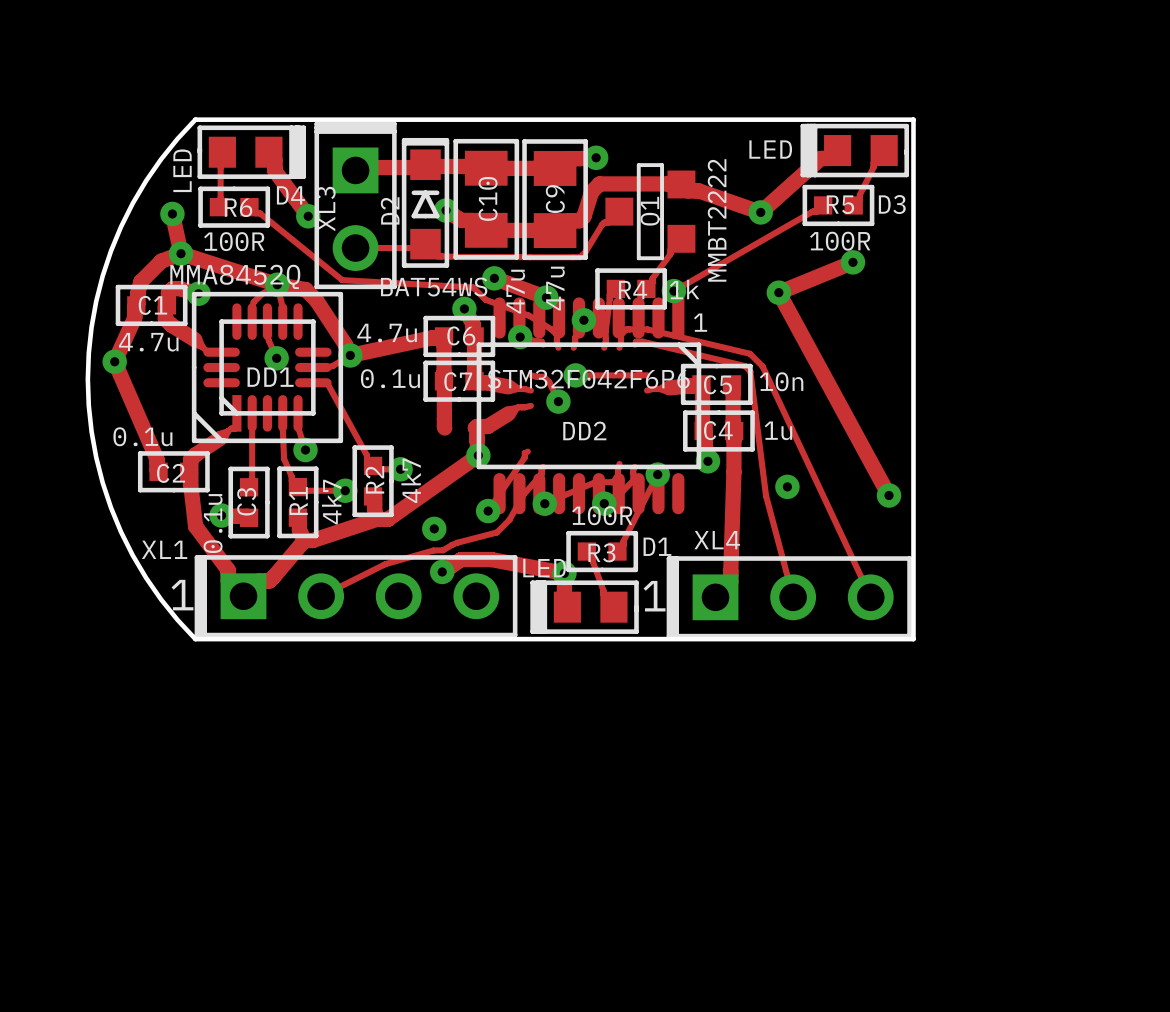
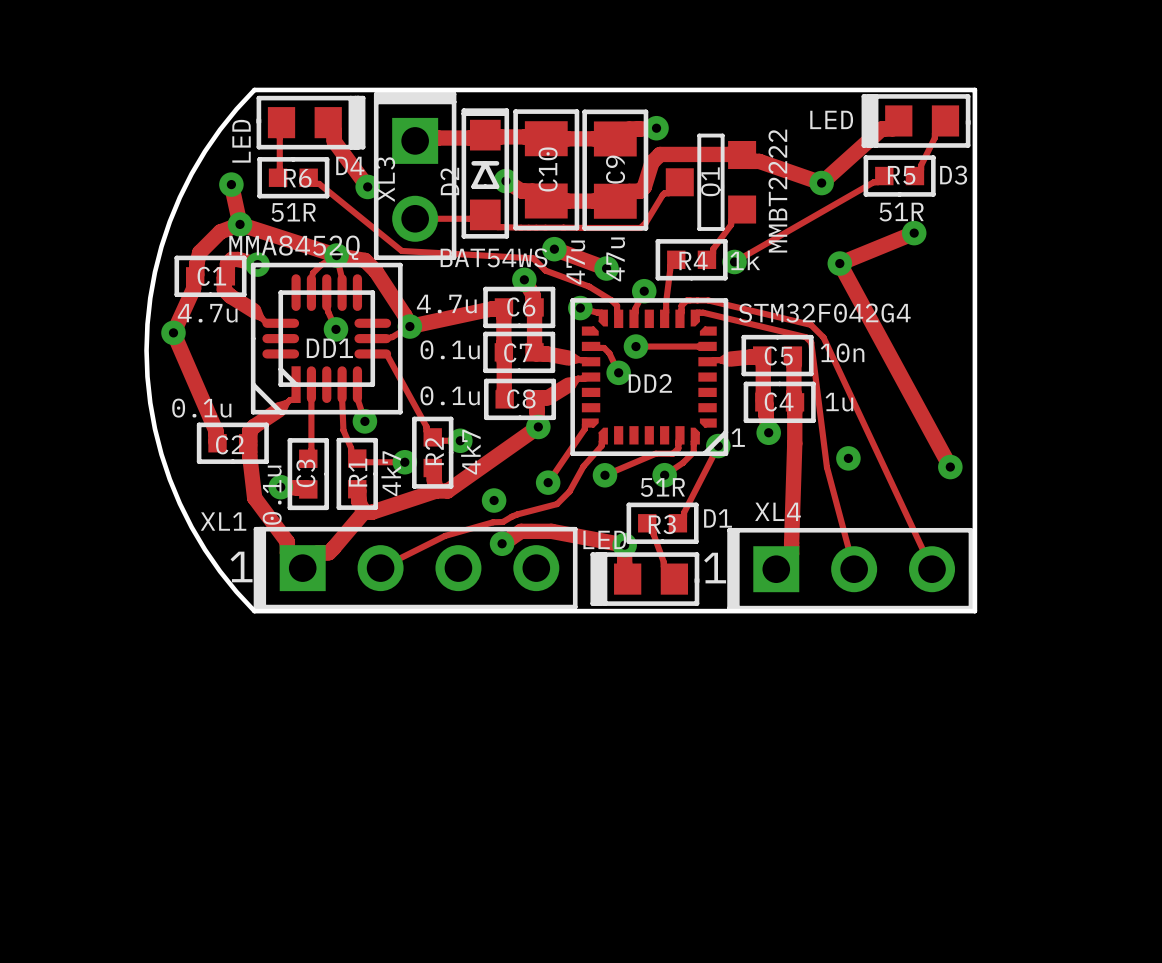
R6 value: 100R (234, 241) -> 51R (293, 212)
R5 value: 100R (840, 241) -> 51R (901, 212)
DD2 footprint: [476, 297, 702, 515] -> [570, 298, 729, 457]
DD2 value: STM32F042F6P6 (588, 379) -> STM32F042G4 (824, 313)
C8: none -> 0.1u (520, 399)
R3 value: 100R (602, 515) -> 51R (662, 487)

